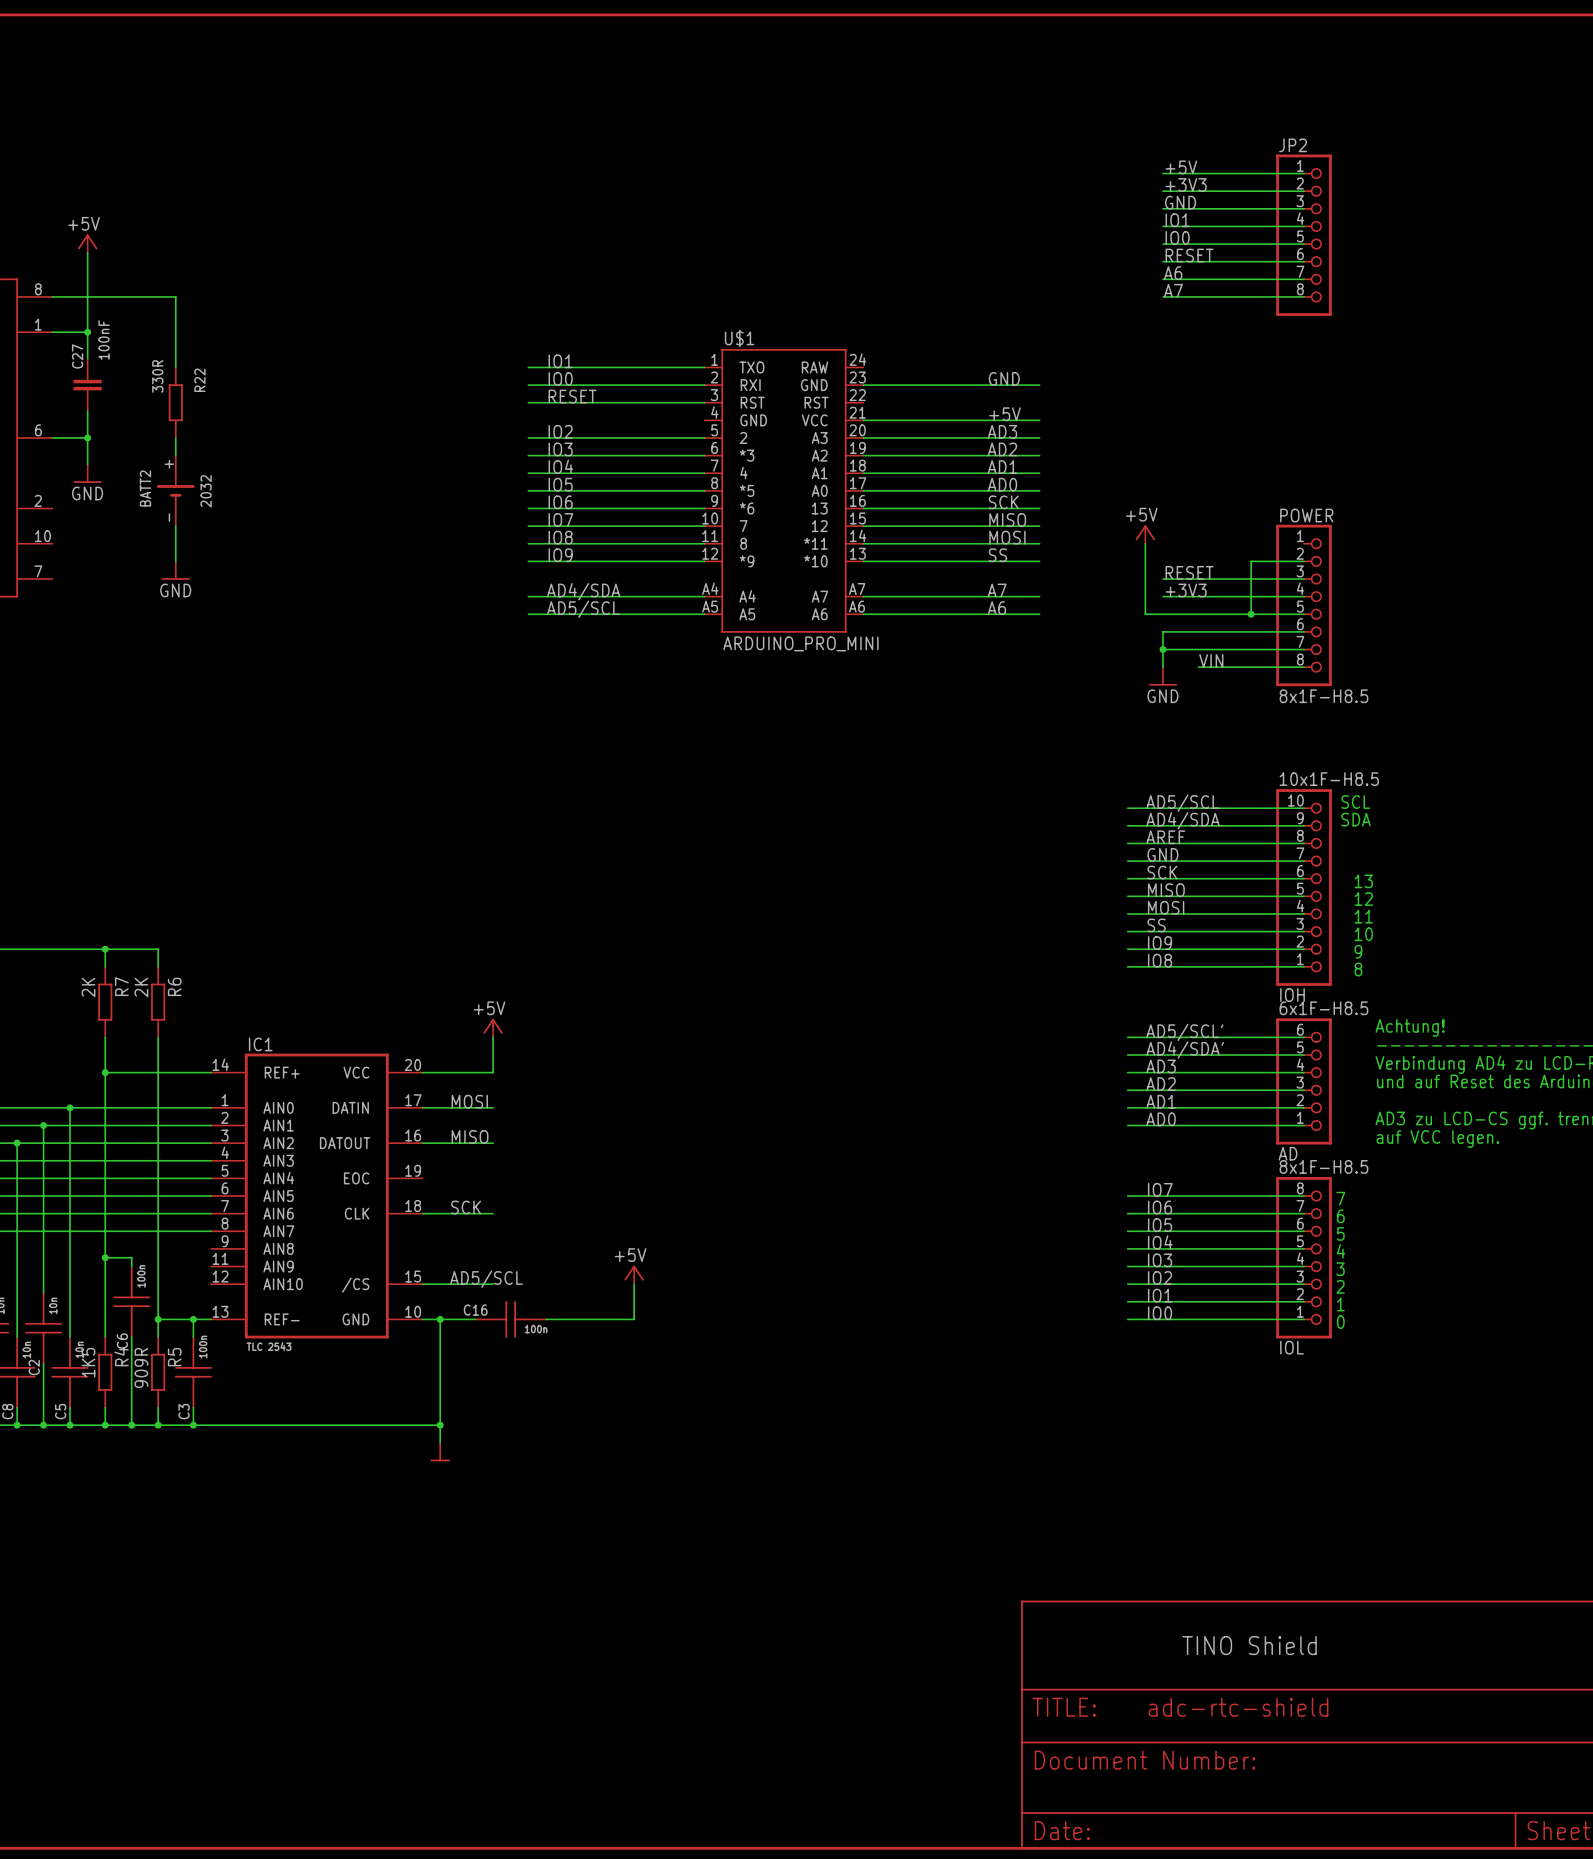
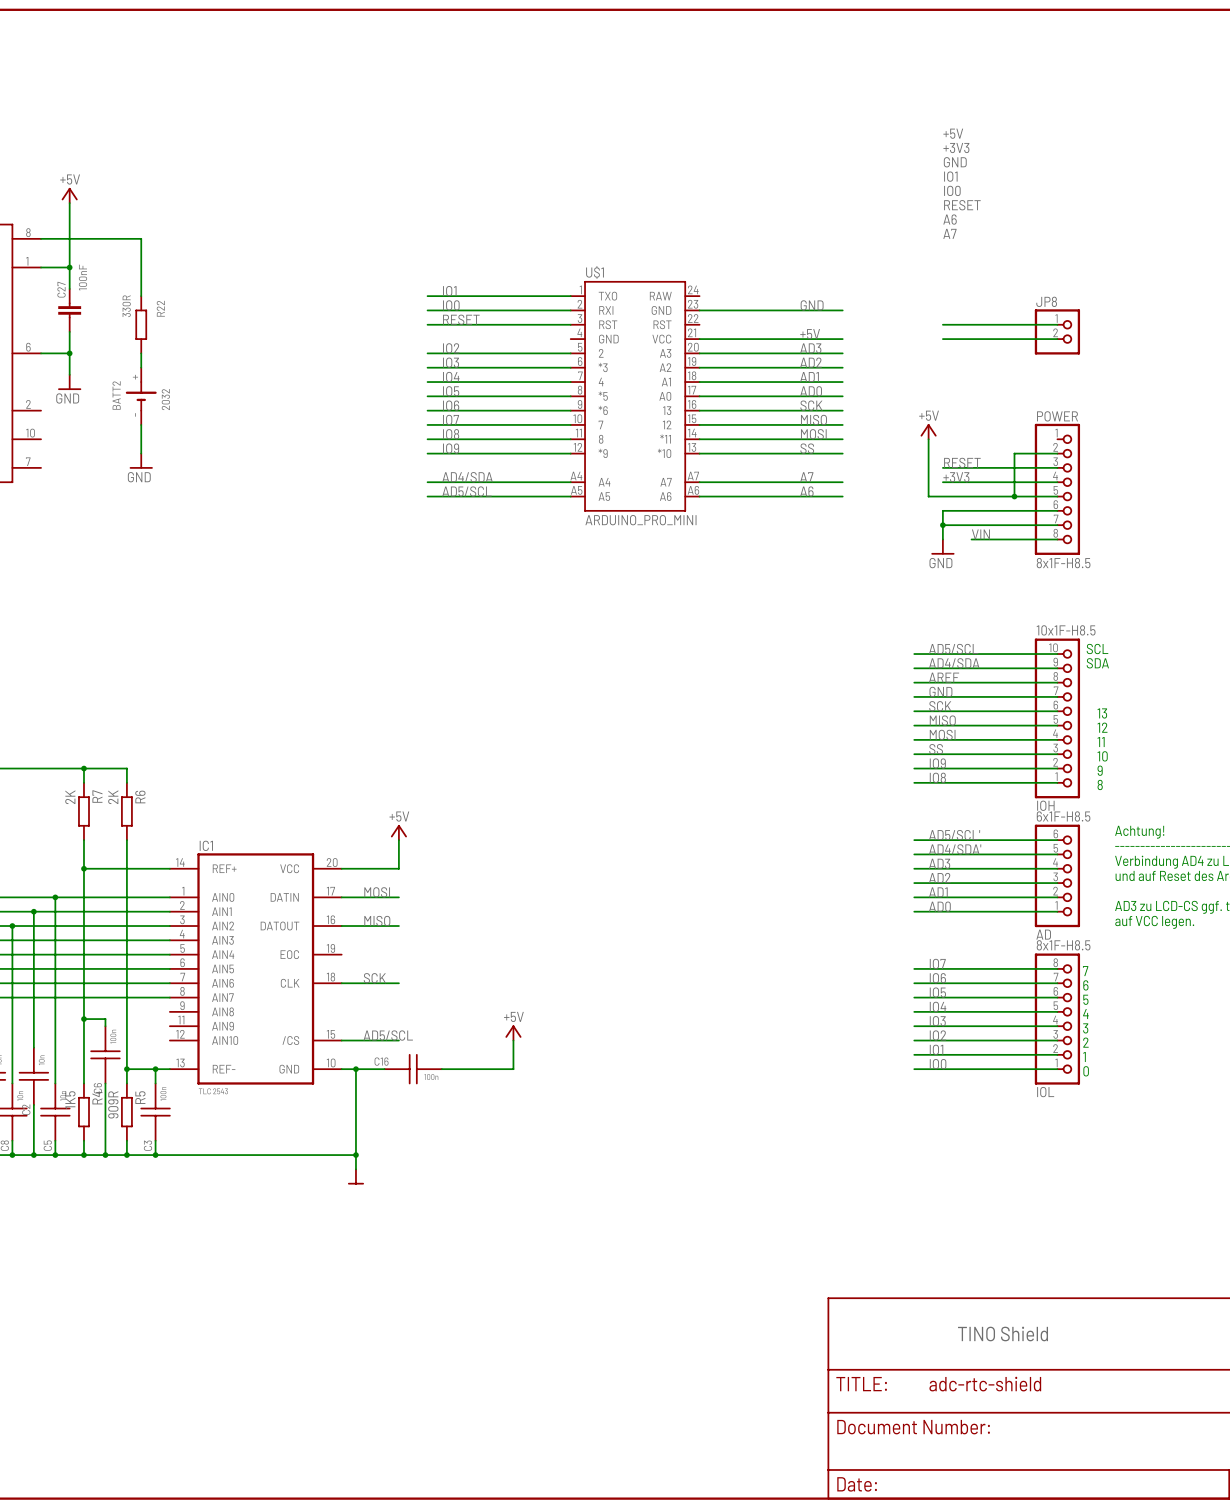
wire: (1162, 173) (1304, 173) -> none
wire: (1162, 191) (1304, 191) -> none
wire: (1162, 208) (1304, 208) -> none
wire: (1162, 226) (1304, 226) -> none
JP2: (1304, 235) -> none
wire: (1162, 244) (1304, 244) -> none
wire: (1162, 261) (1304, 261) -> none
wire: (1162, 279) (1304, 279) -> (942, 324) (1057, 324)
wire: (1162, 296) (1304, 296) -> (942, 339) (1057, 339)
JP8: none -> (1057, 331)

